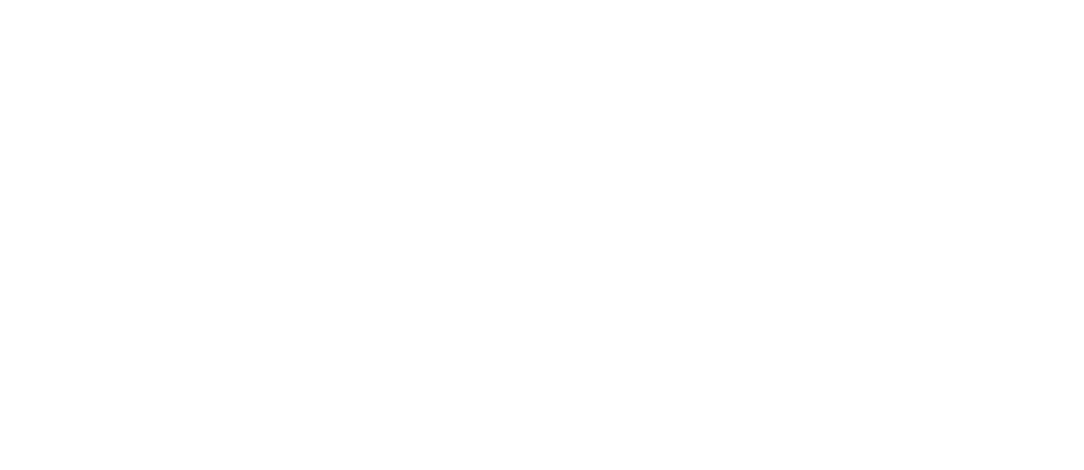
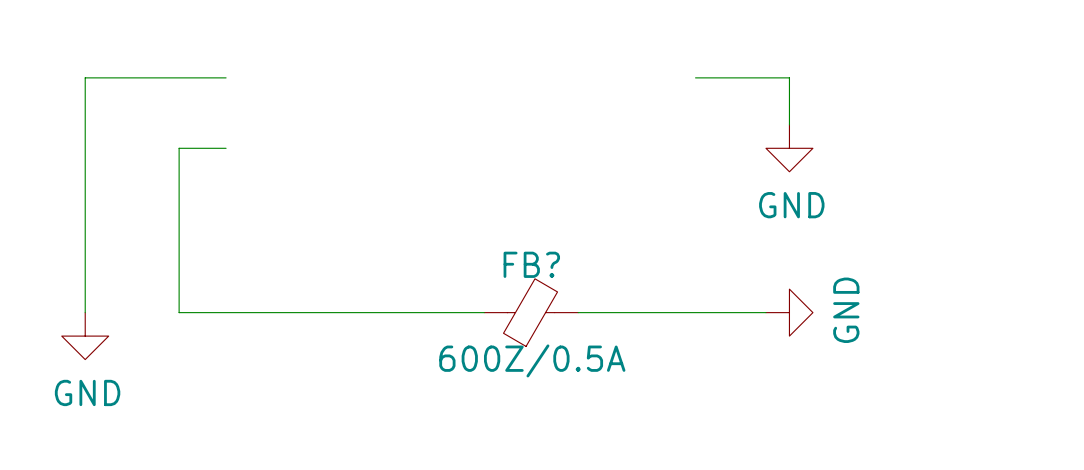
wire: none -> (226, 77) (85, 77) (85, 312)
wire: none -> (695, 77) (789, 77) (789, 124)
wire: none -> (226, 148) (179, 148) (179, 312) (484, 312)
power symbol: none -> GND (789, 148)
FB?: none -> (531, 312)
wire: none -> (578, 312) (765, 312)
power symbol: none -> GND (789, 312)
power symbol: none -> GND (85, 336)

